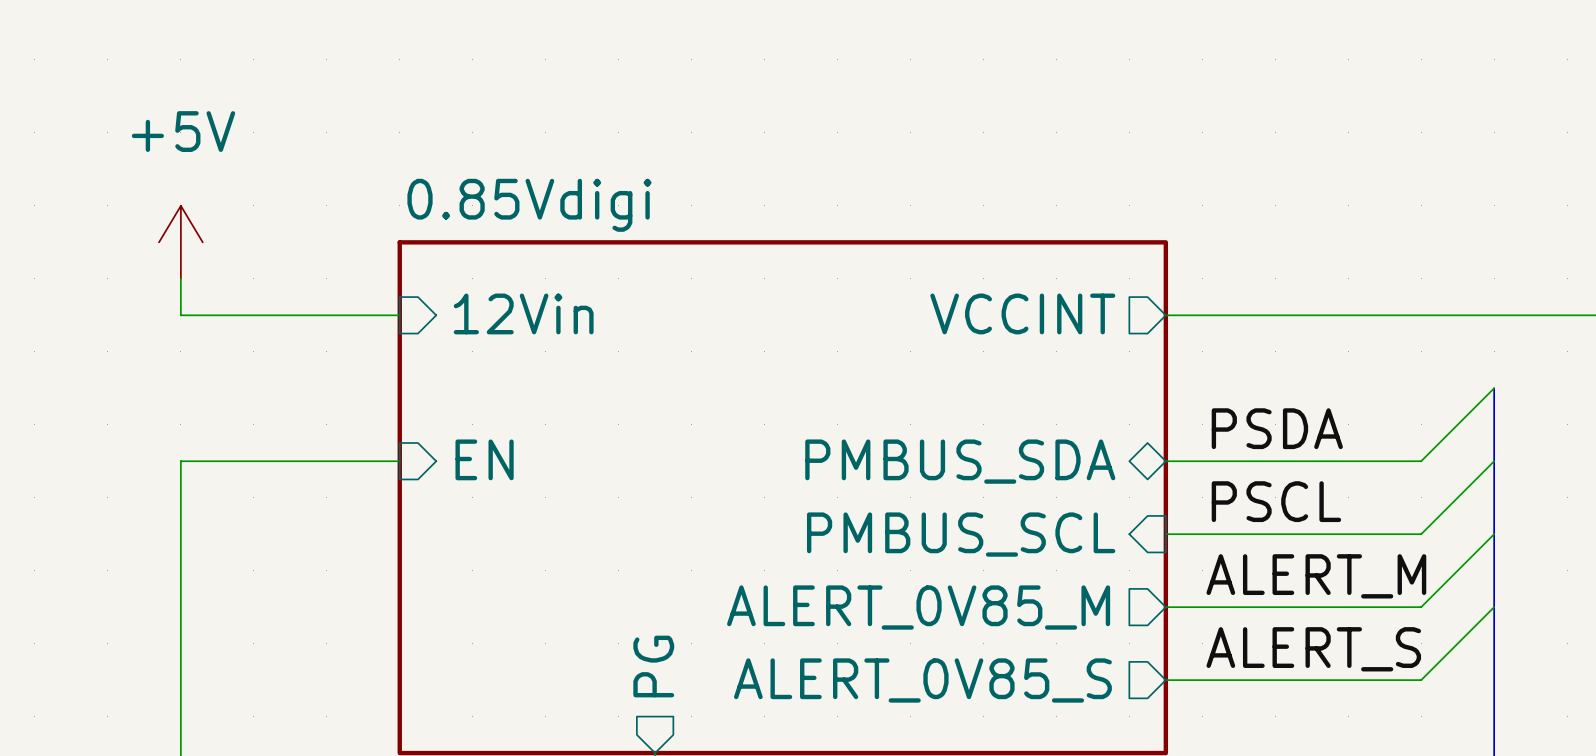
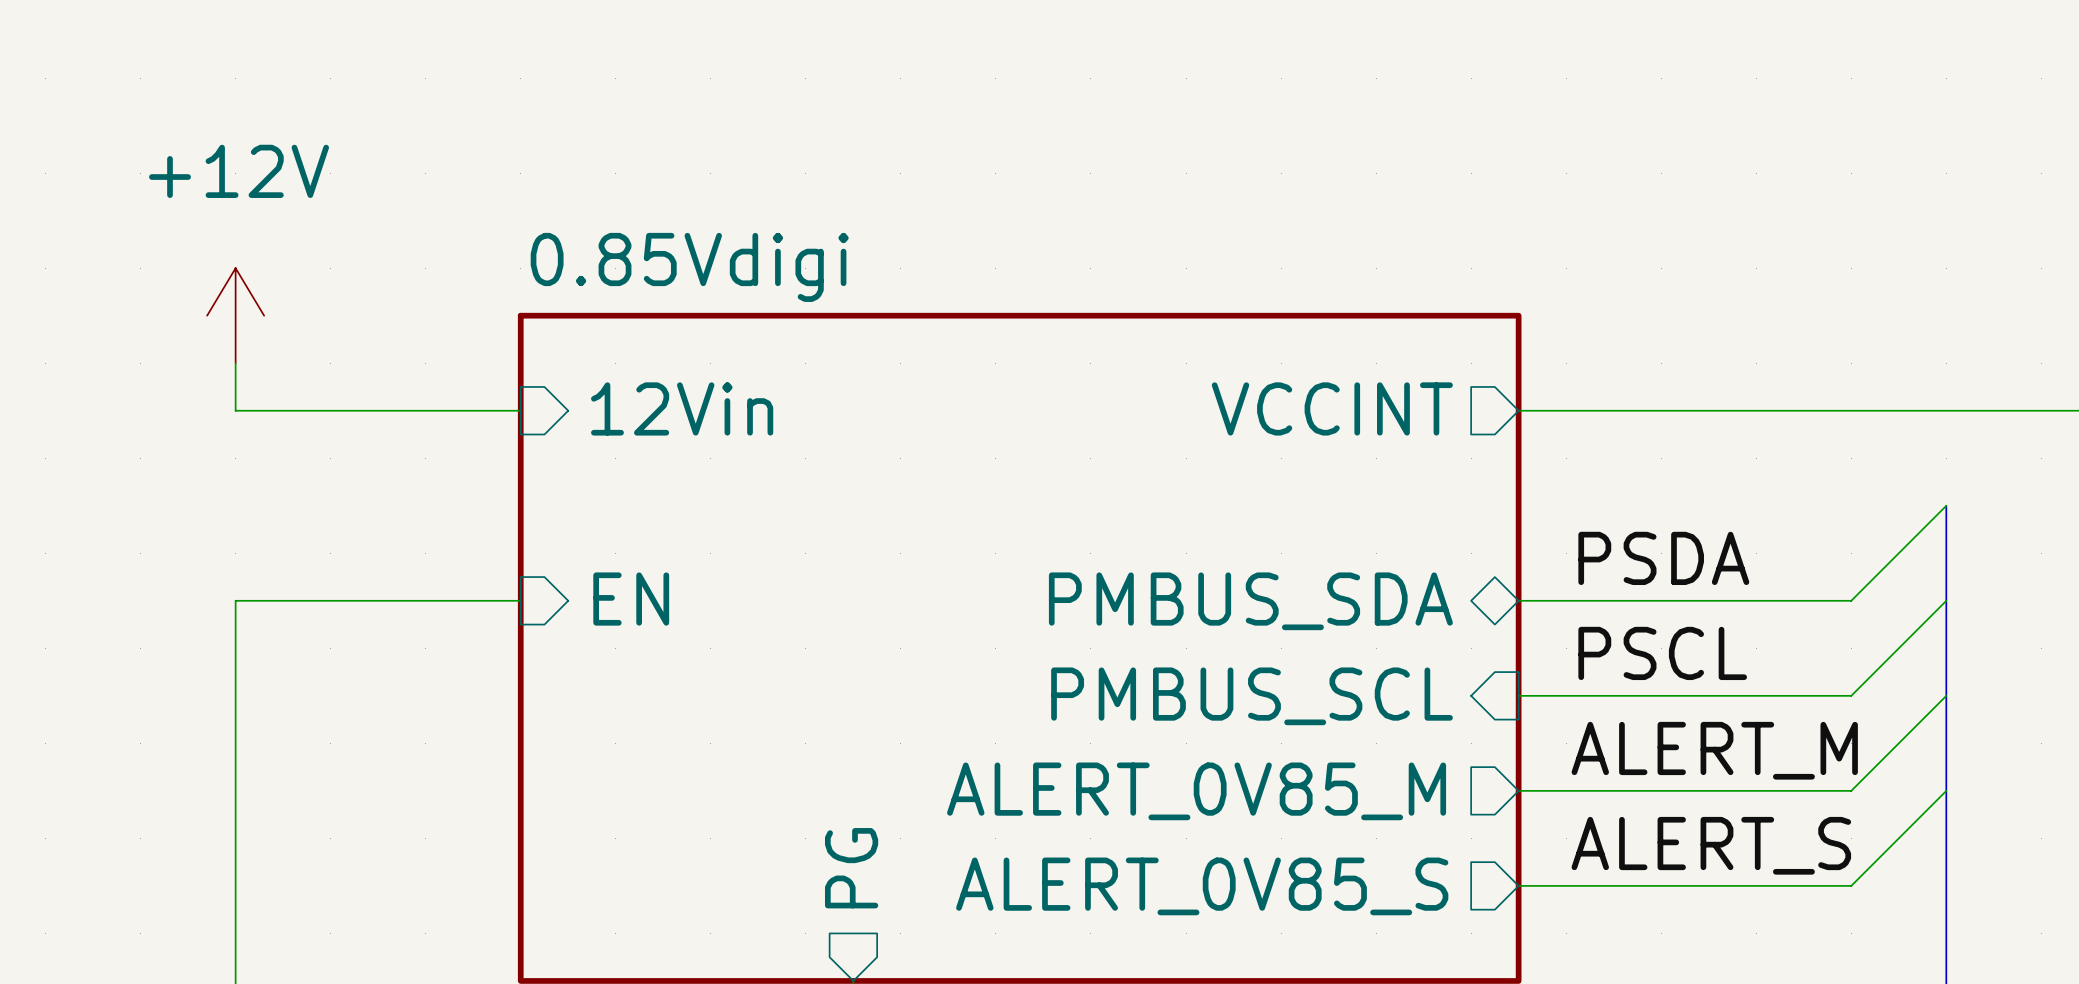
power symbol: +5V (180, 242) -> +12V (235, 315)

